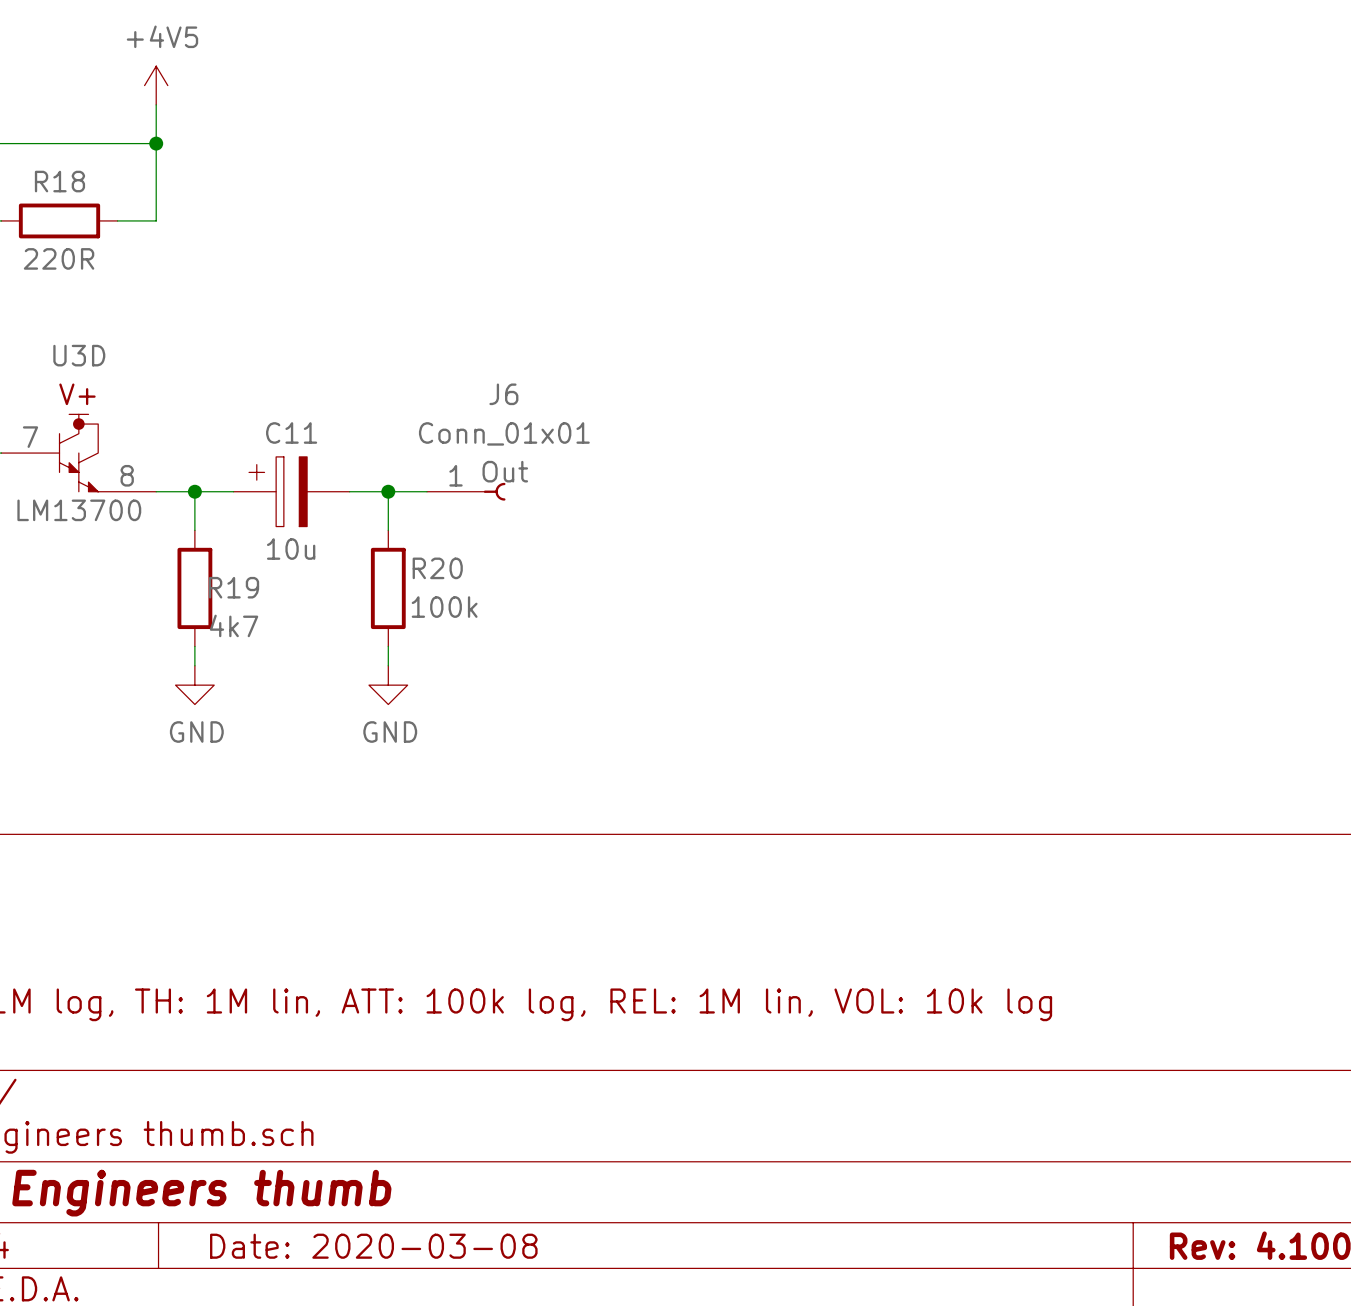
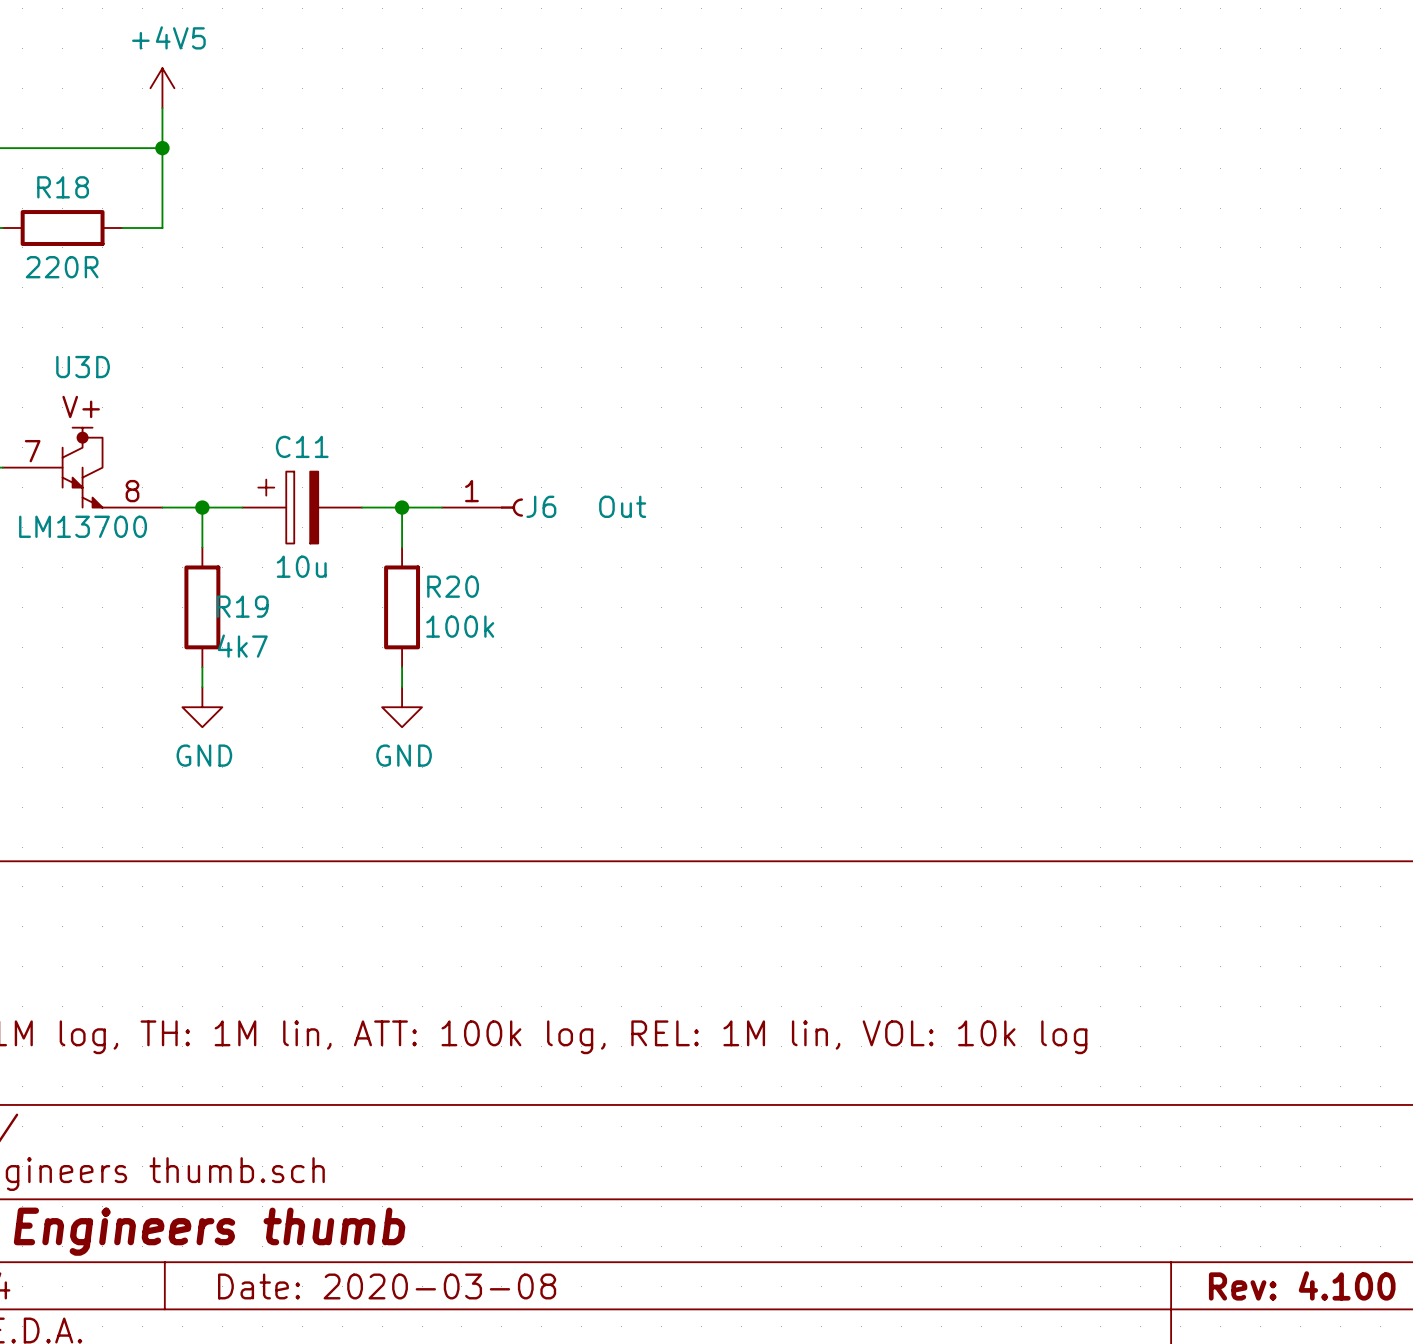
J6 name position: J6 (503, 394) -> J6 (541, 506)
J6 value: Conn_01x01 (504, 433) -> Out (622, 506)
J6 text: Out (505, 471) -> none

